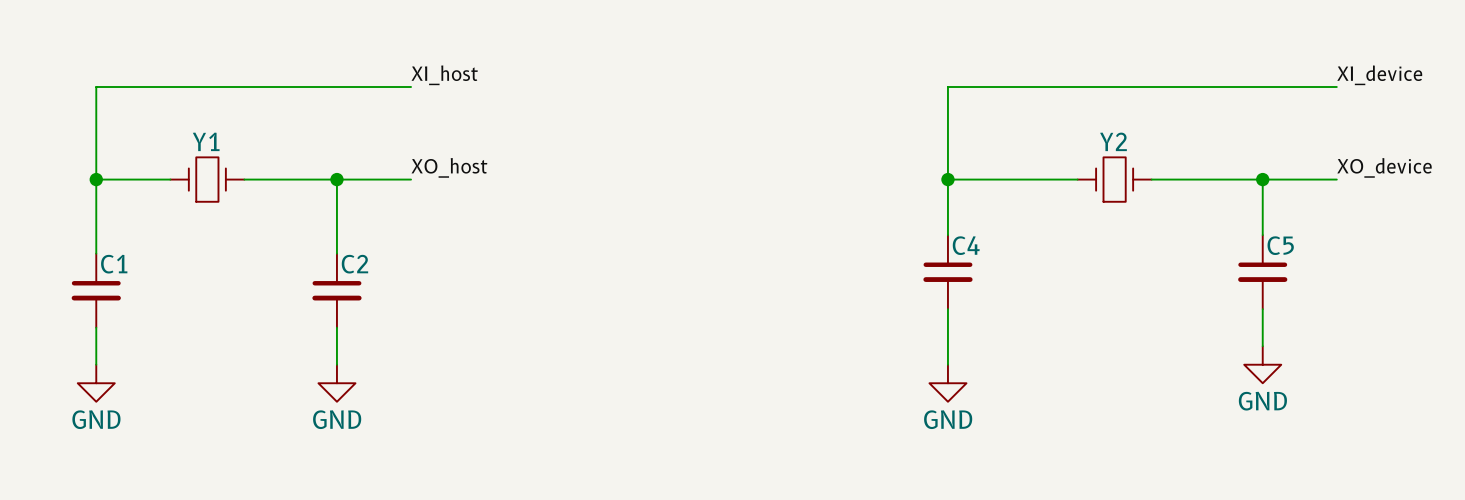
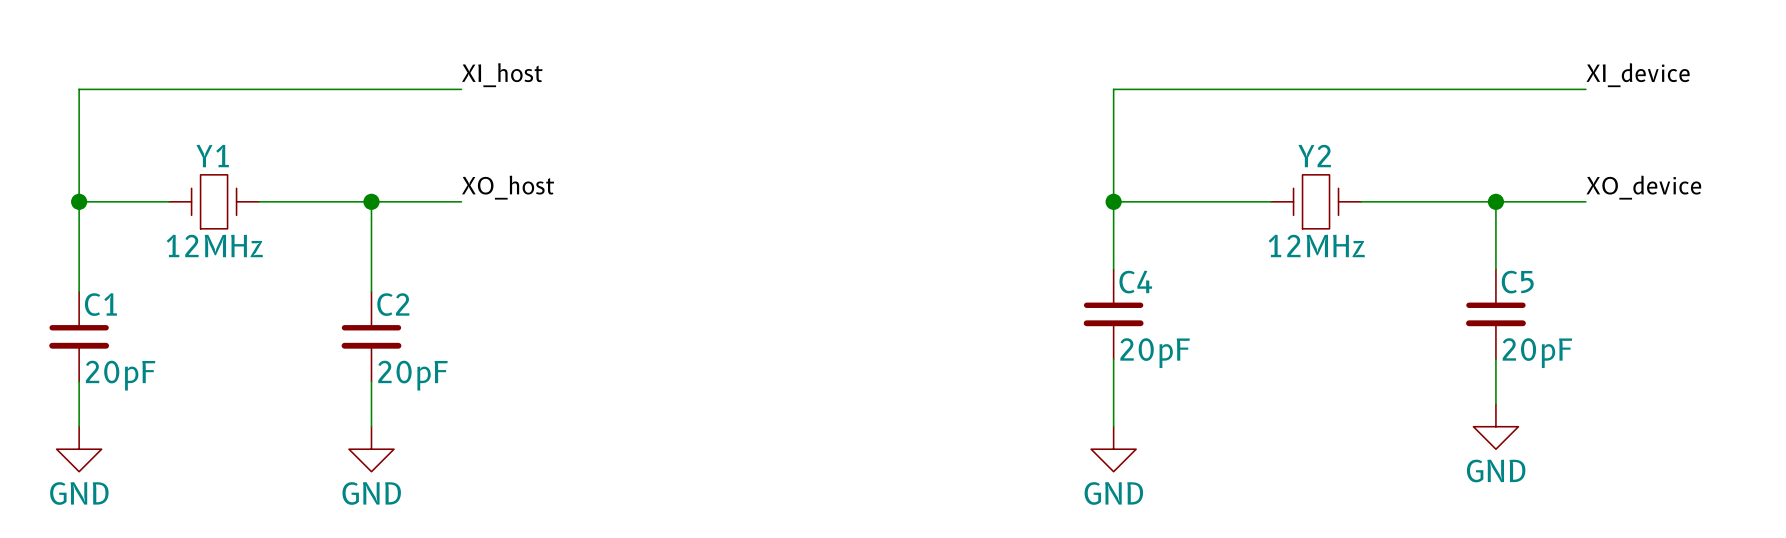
Y1 value: none -> 12MHz (214, 245)
Y2 value: none -> 12MHz (1316, 245)
C4 value: none -> 20pF (1155, 353)
C5 value: none -> 20pF (1537, 353)
C1 value: none -> 20pF (120, 375)
C2 value: none -> 20pF (412, 375)

